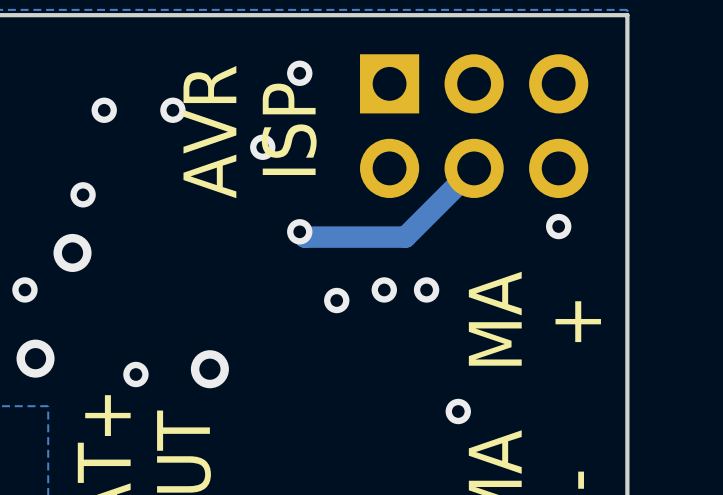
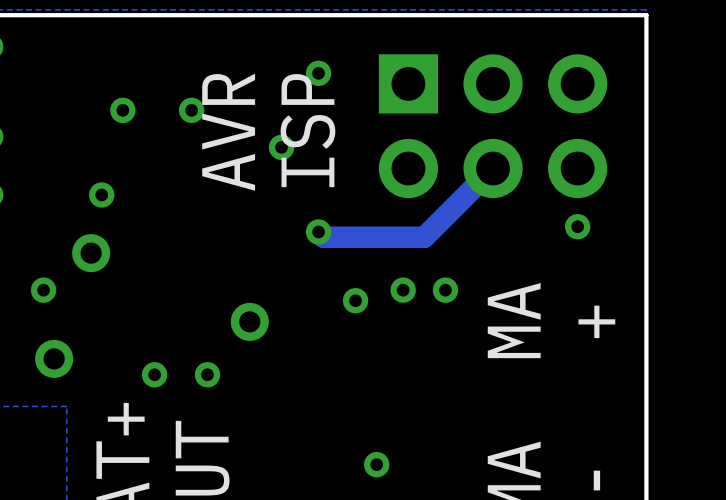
via position: (209, 369) -> (249, 321)
via: none -> (207, 374)
via position: (458, 411) -> (376, 464)

